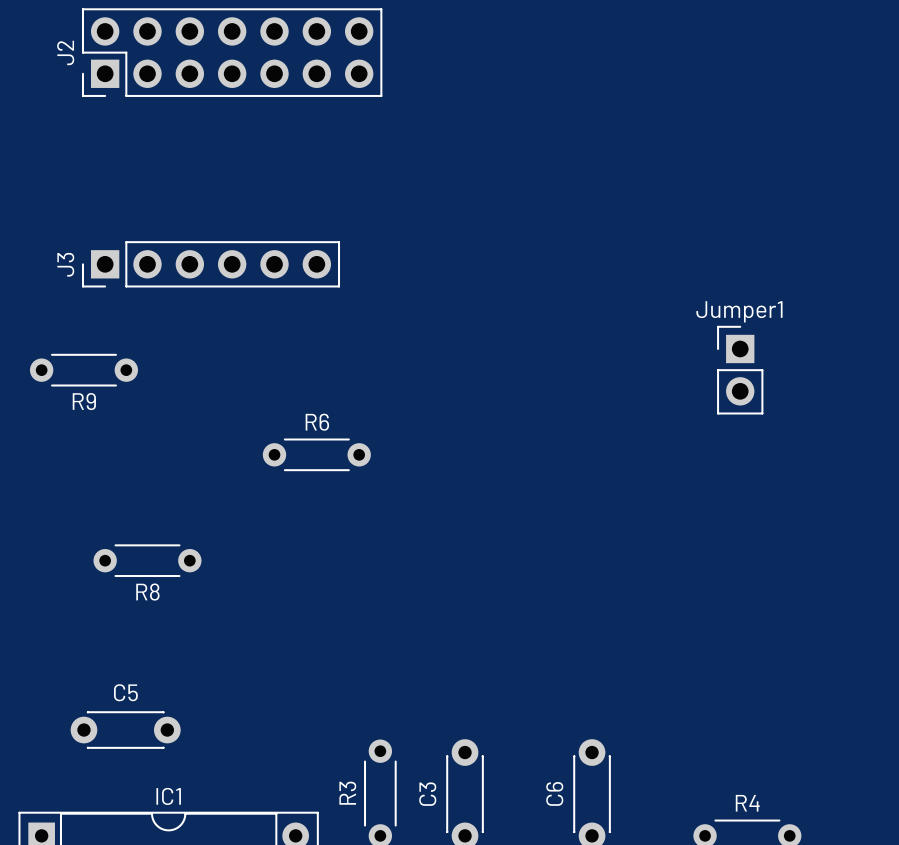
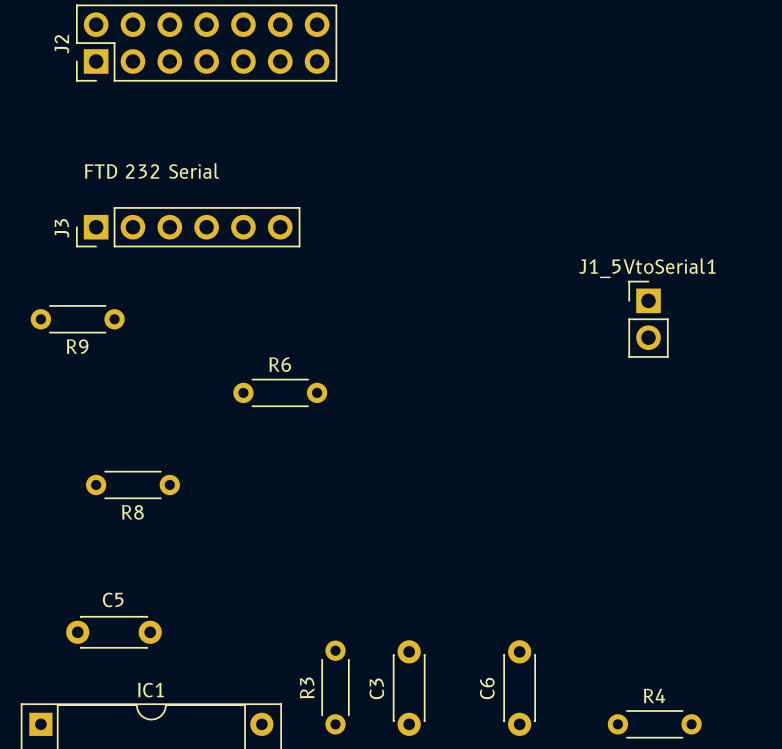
text: none -> FTD 232 Serial (152, 171)
Jumper1 name: Jumper1 (739, 311) -> J1_5VtoSerial1 (647, 268)

